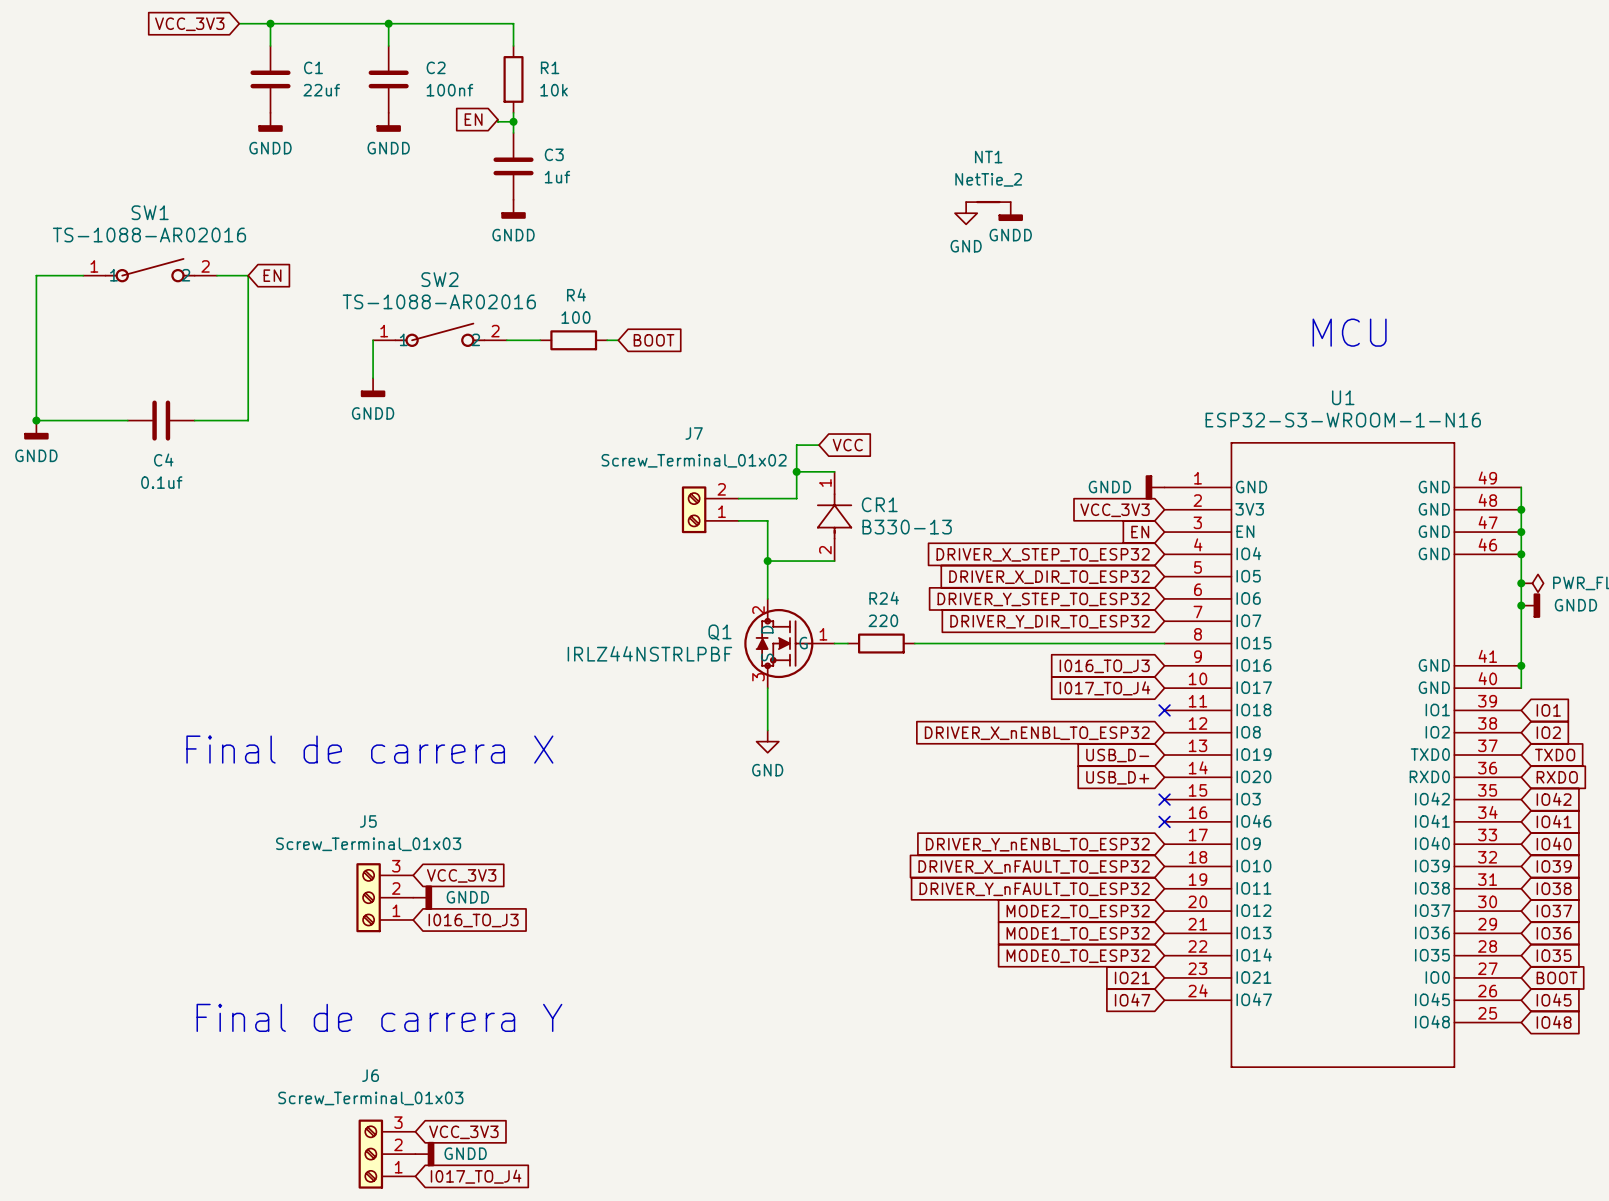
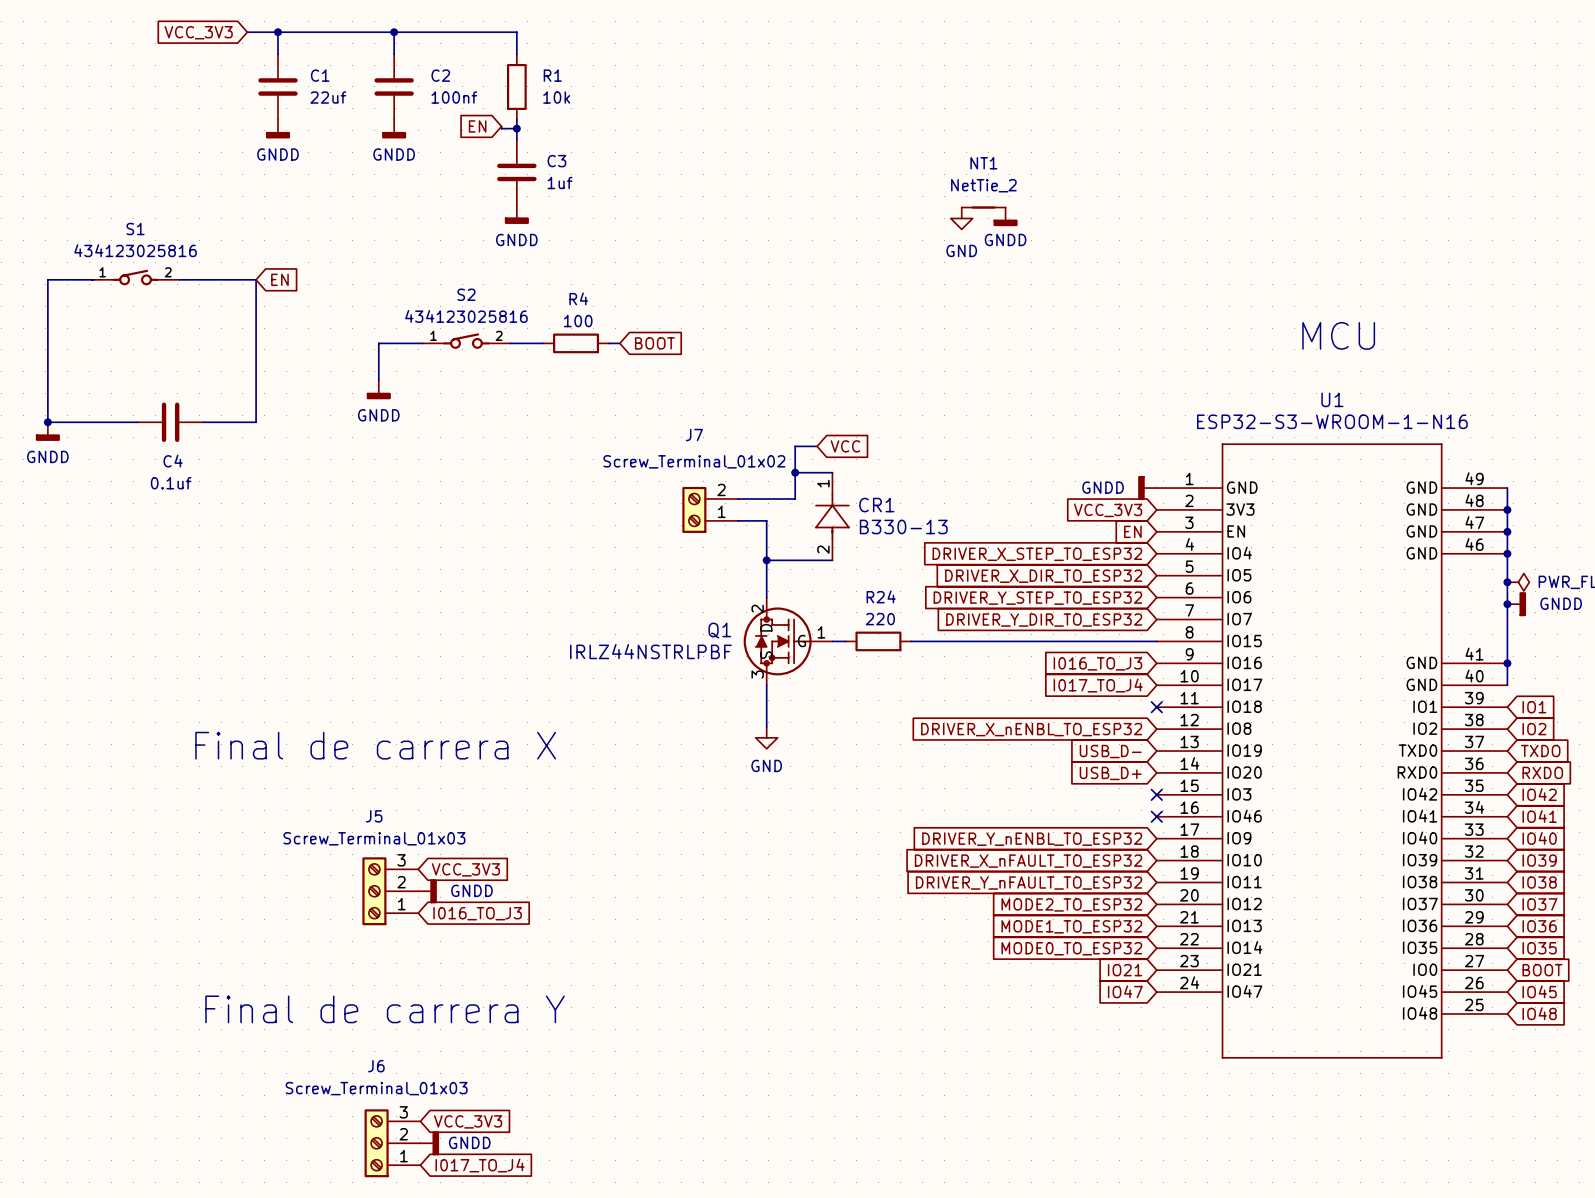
SW1: TS-1088-AR02016 (150, 270) -> none
S1: none -> 434123025816 (135, 277)
SW2: TS-1088-AR02016 (439, 334) -> none
S2: none -> 434123025816 (466, 341)

